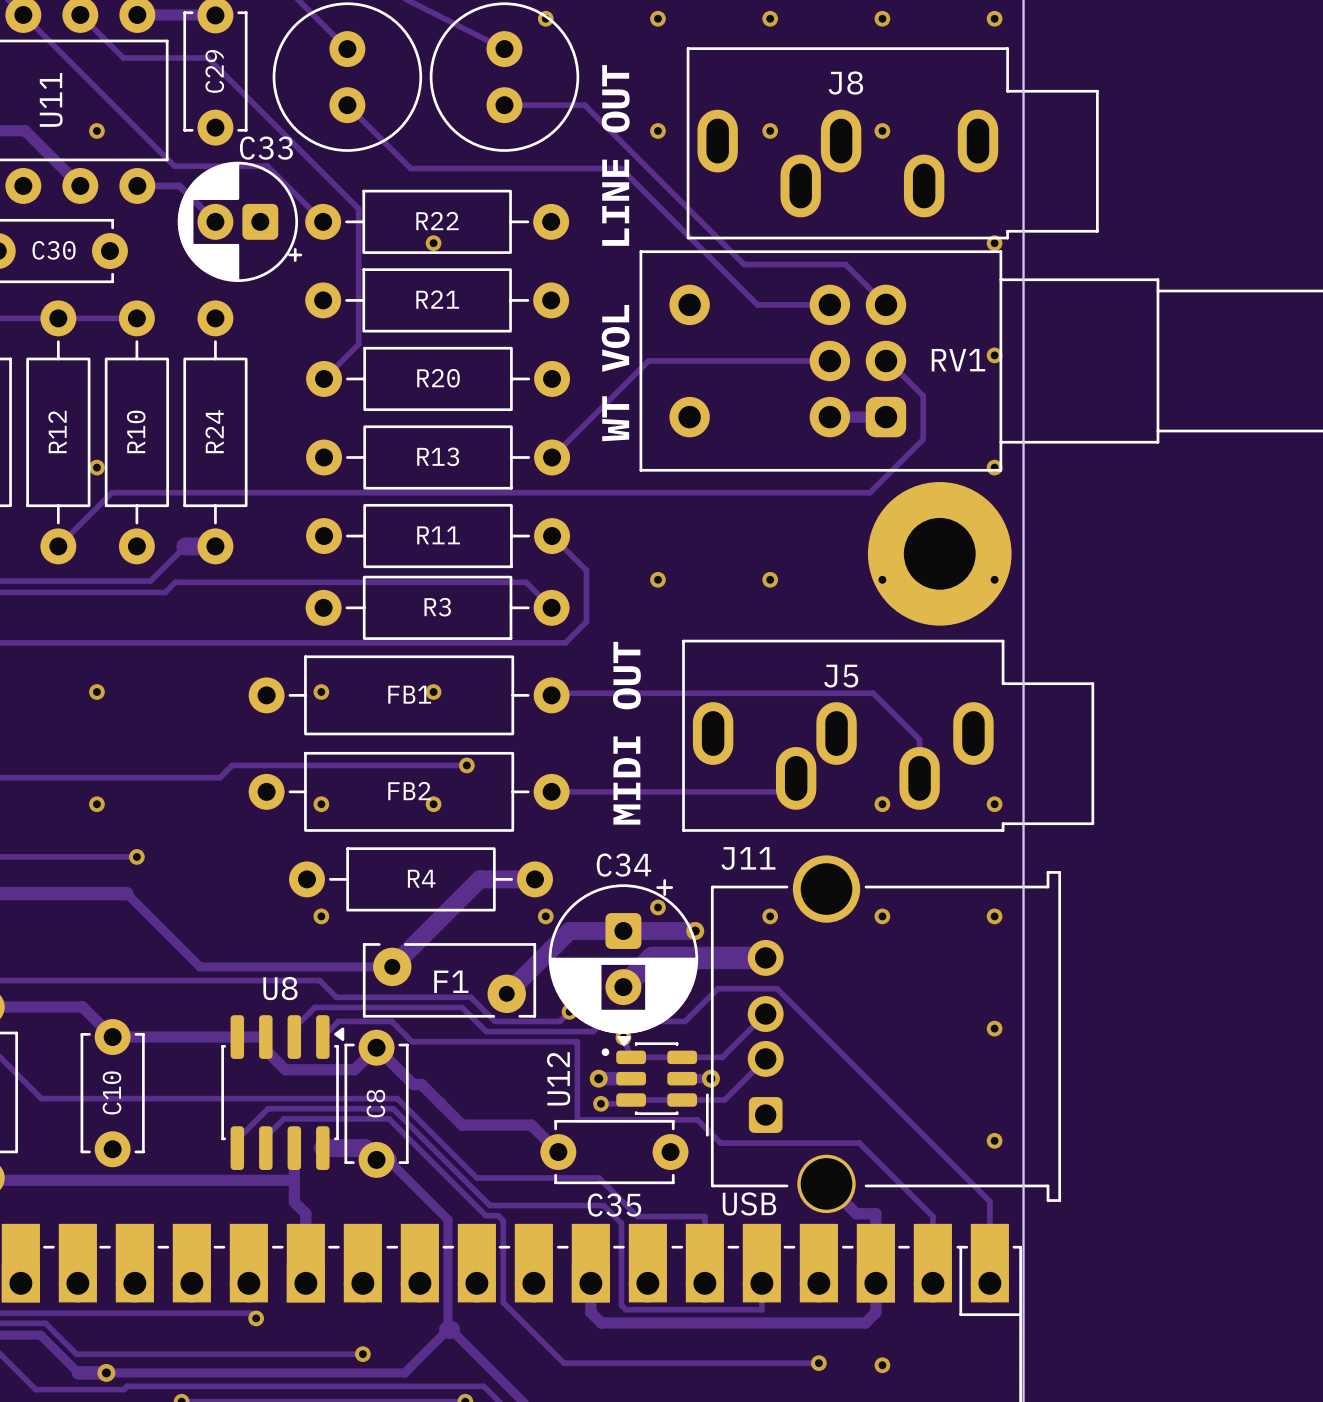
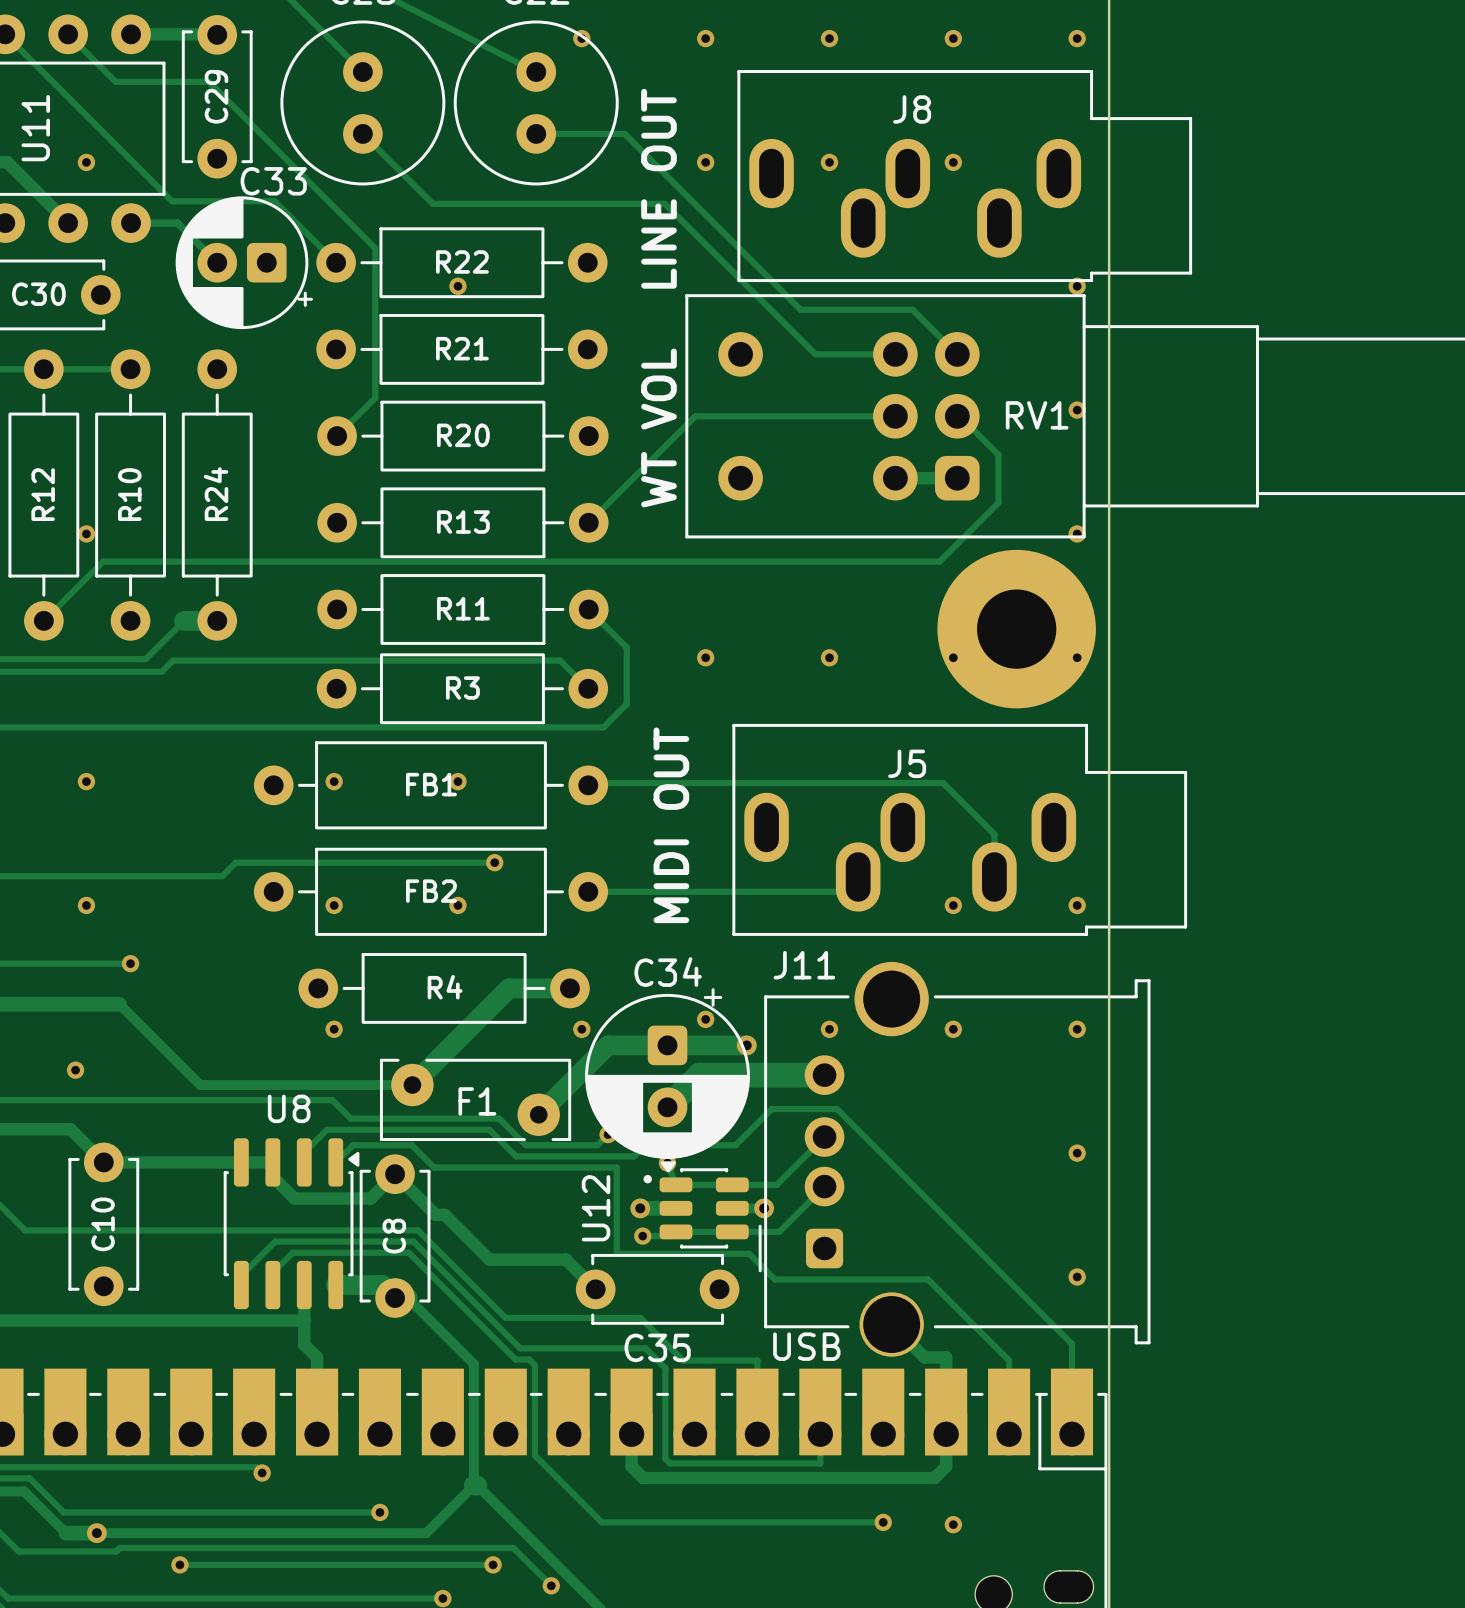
via: none -> (75, 1070)

